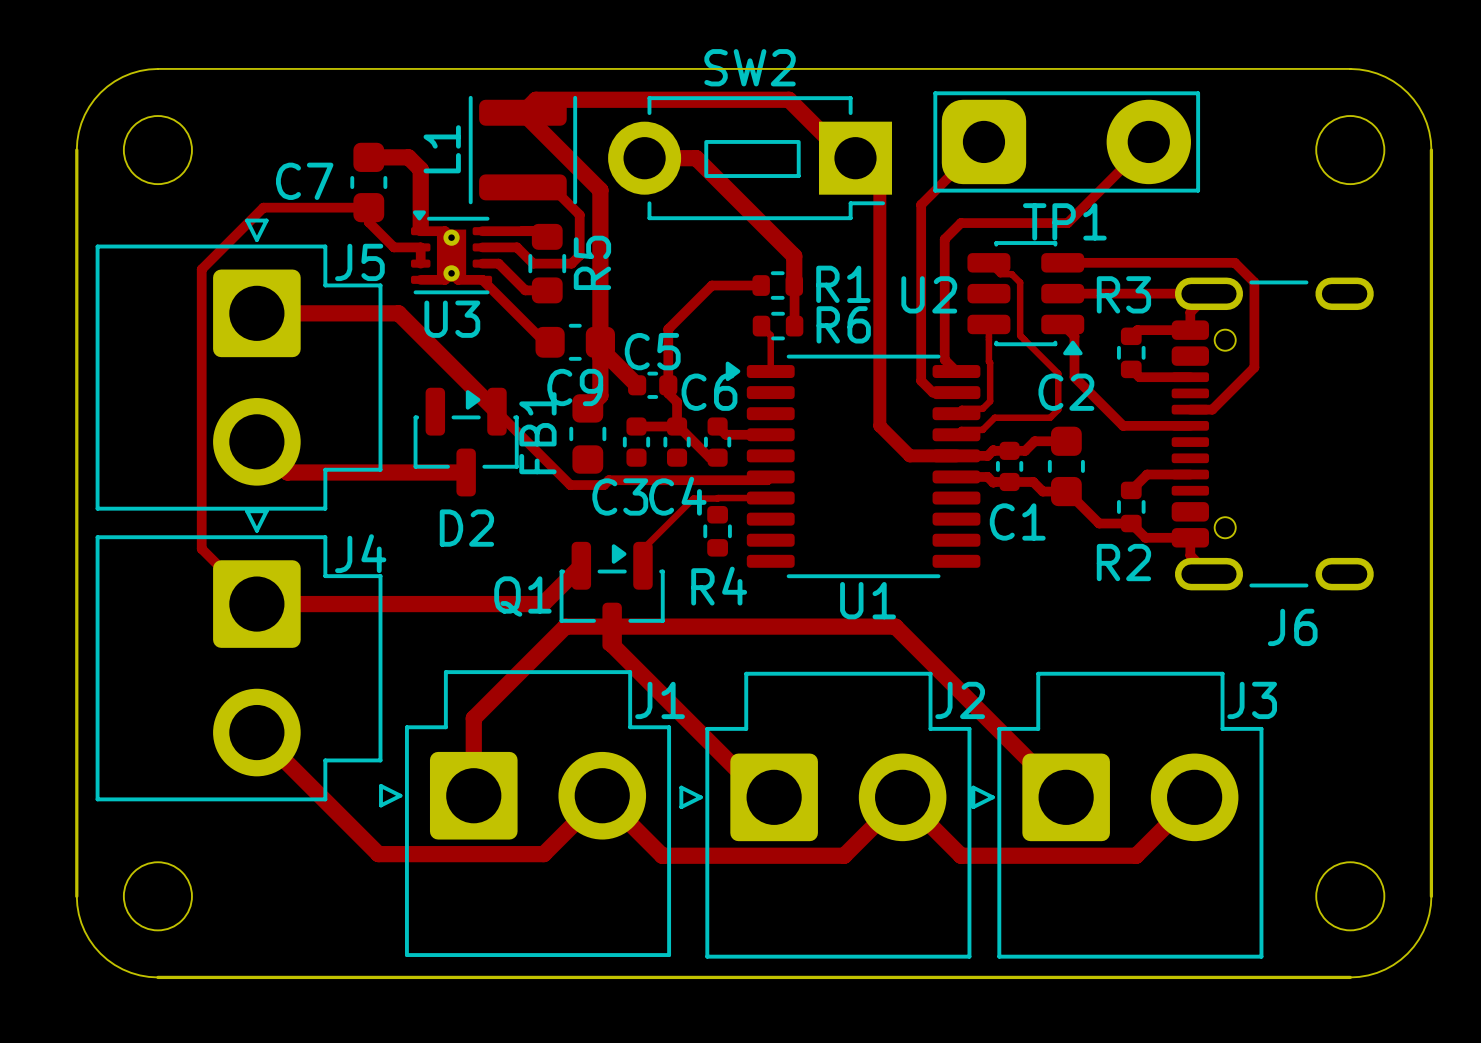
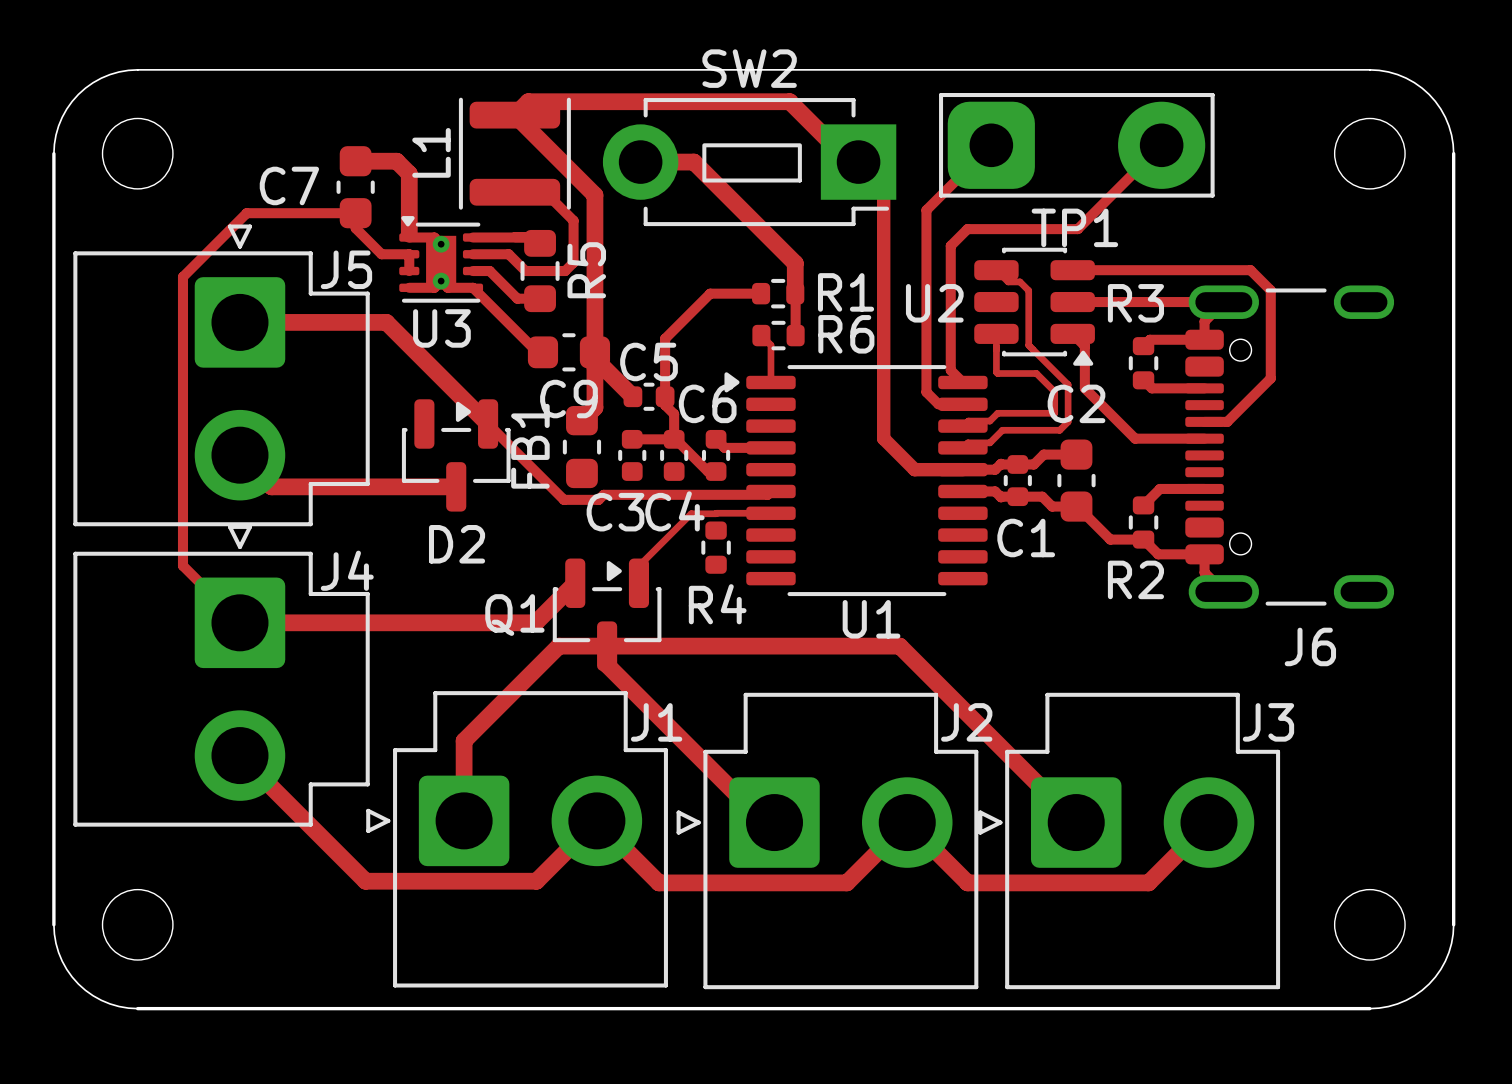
track: (990, 362) (990, 401) -> (997, 373) (1036, 373) (1054, 391) (1054, 413) (997, 413)

